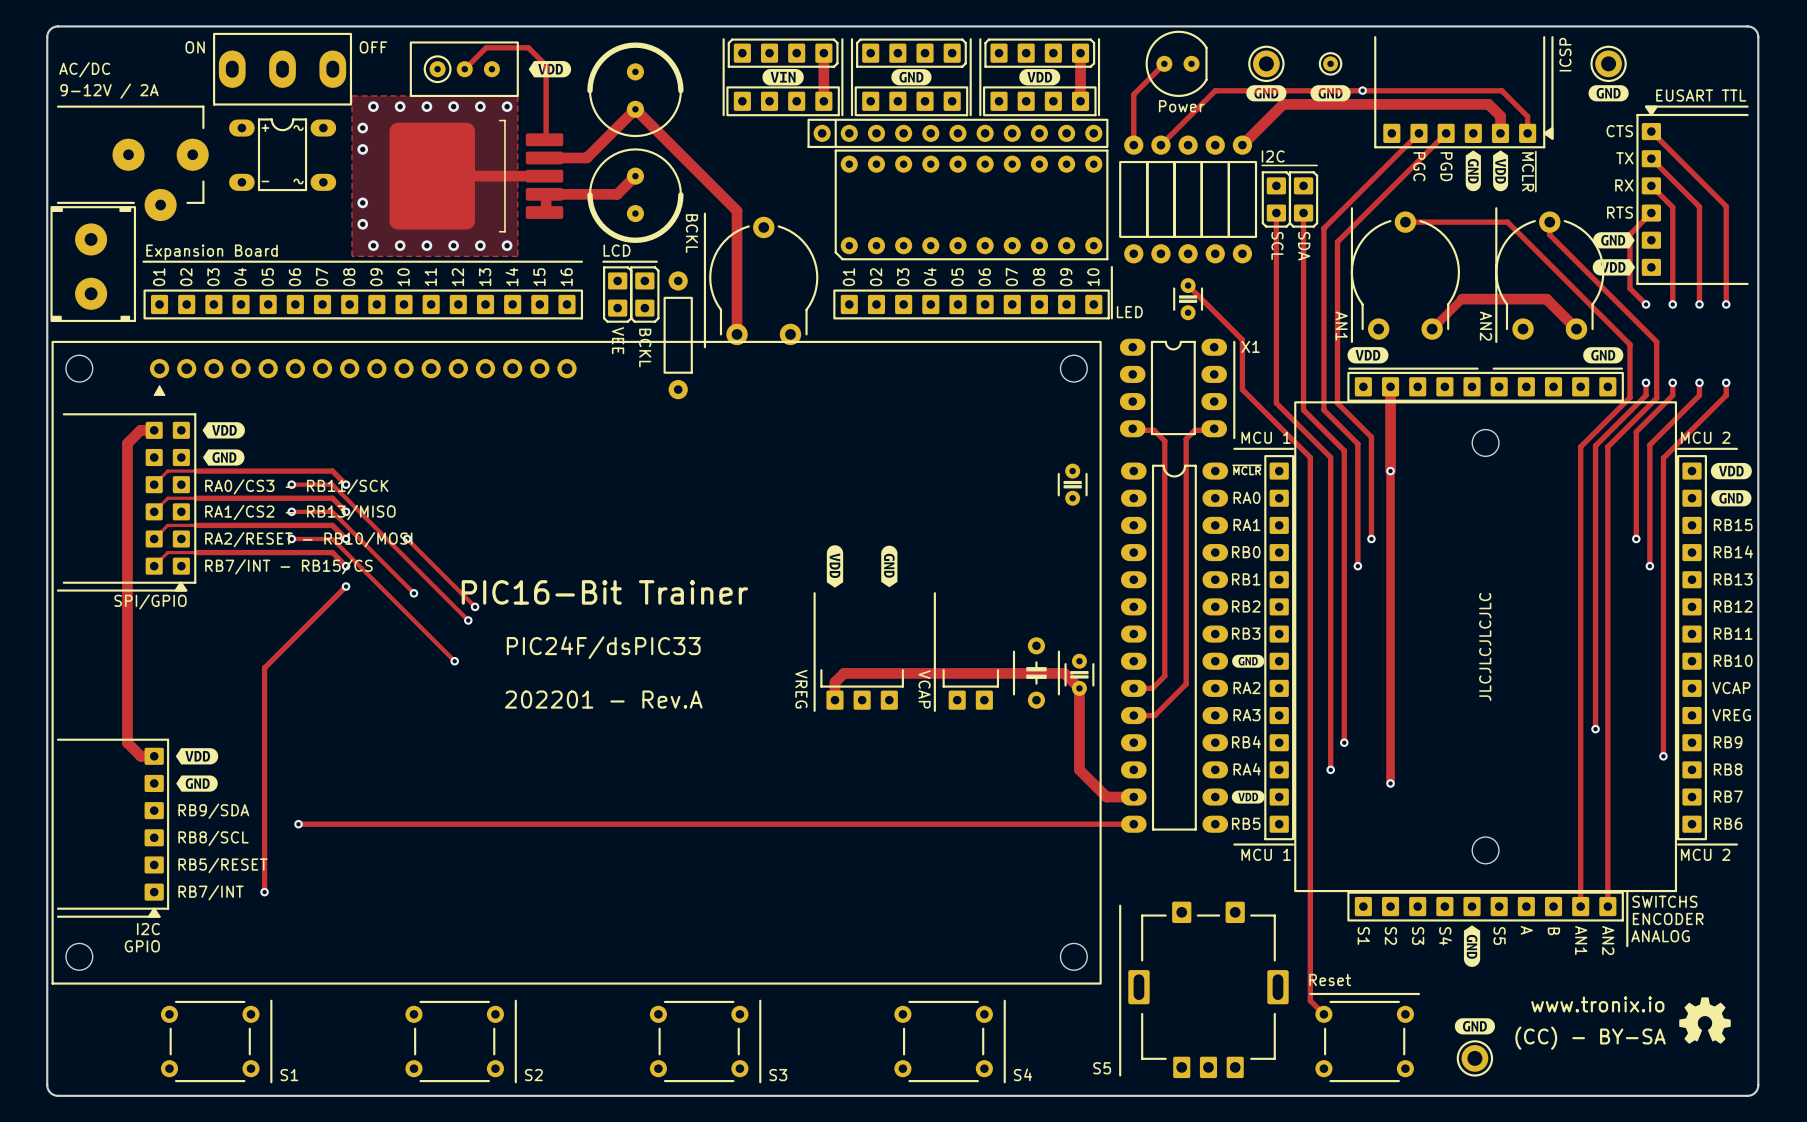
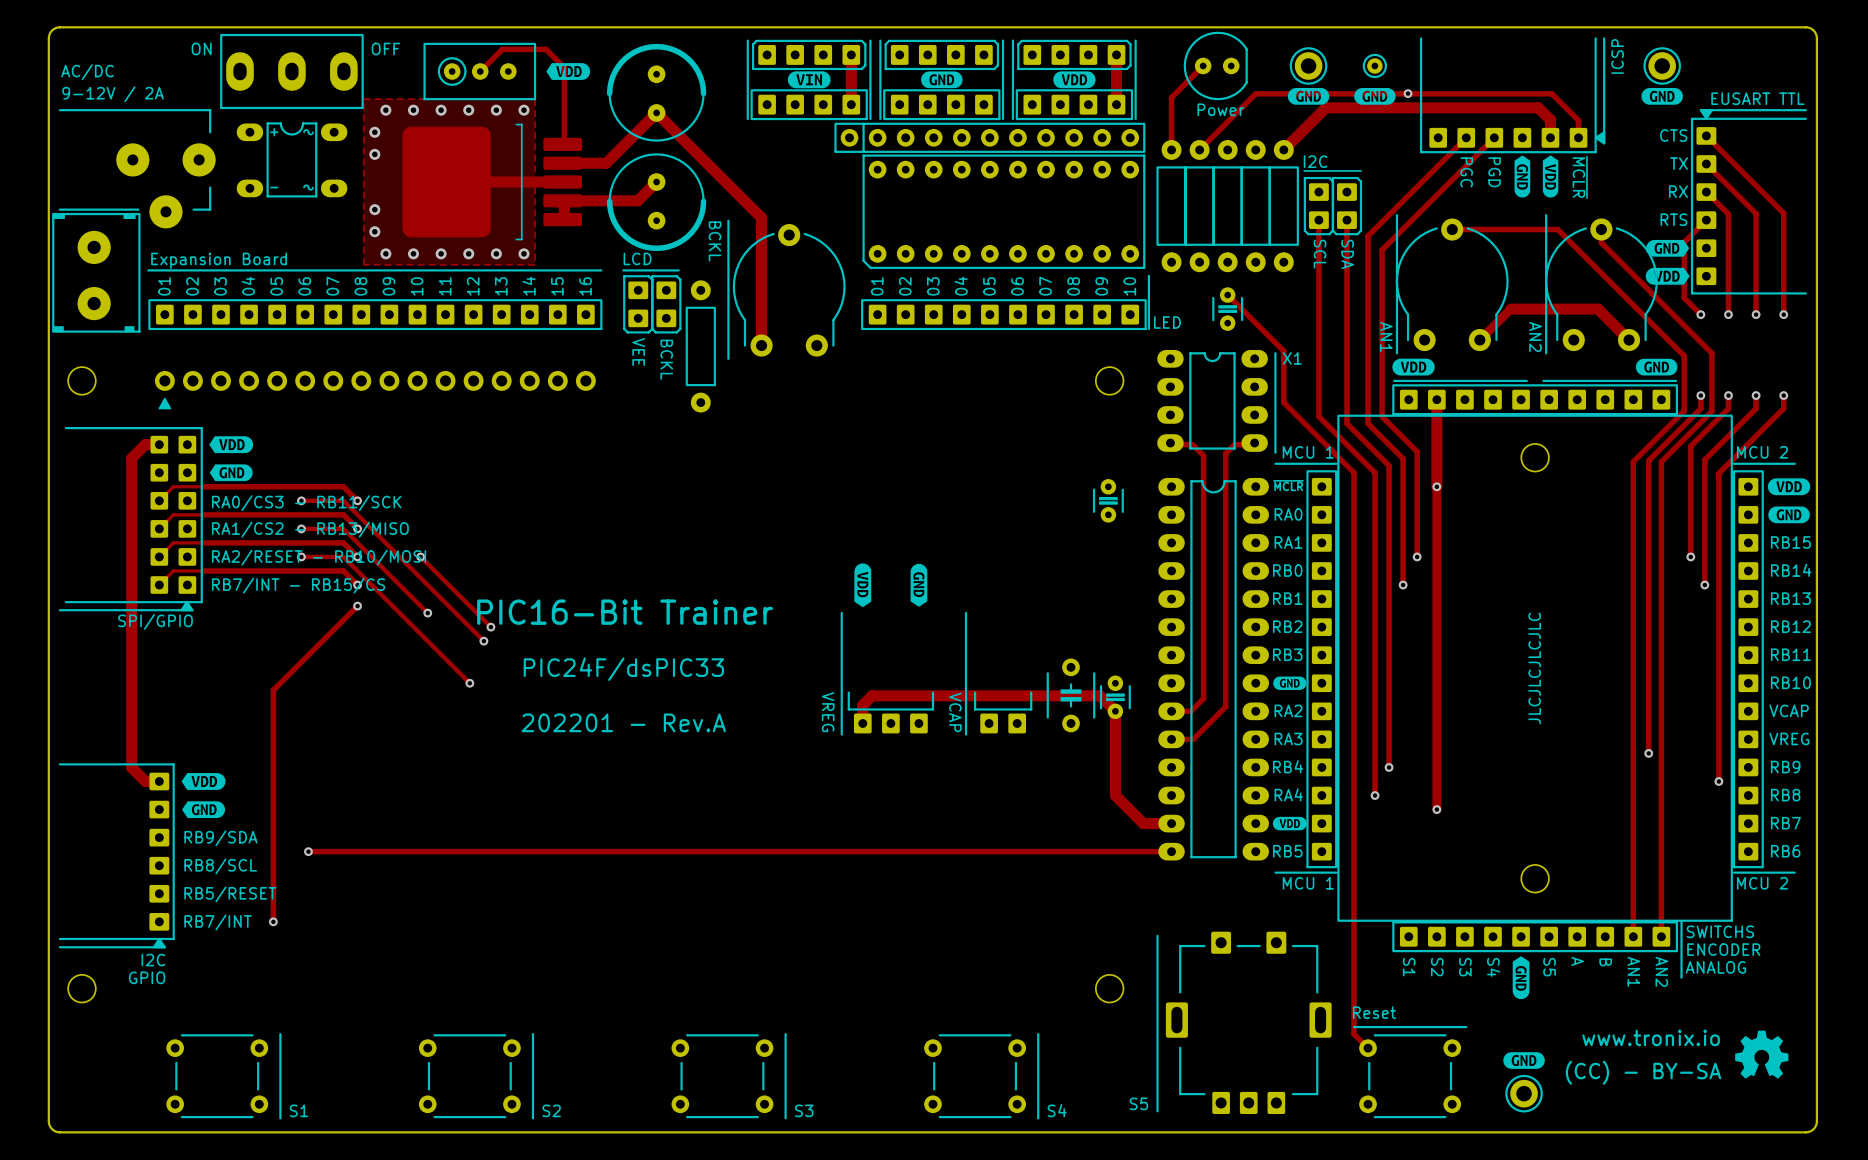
part: none -> (375, 390)
part: (576, 662) -> none

